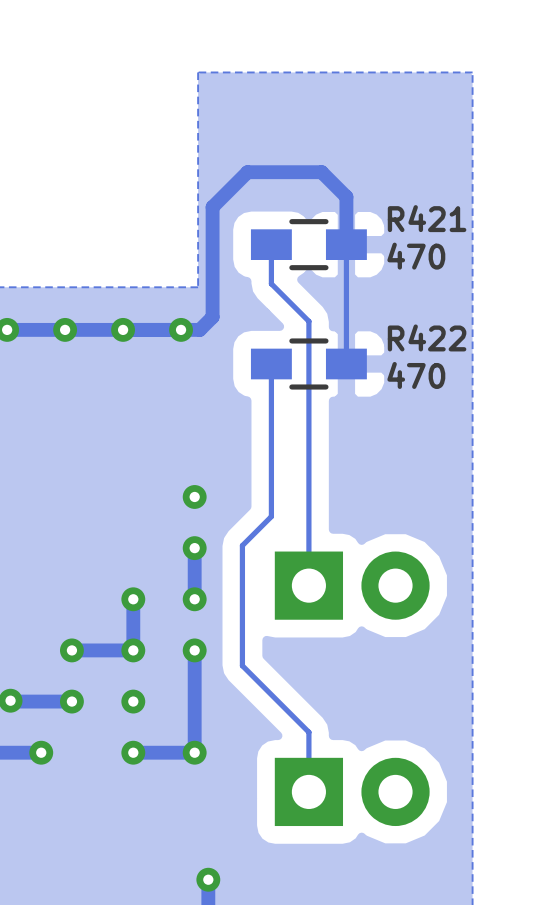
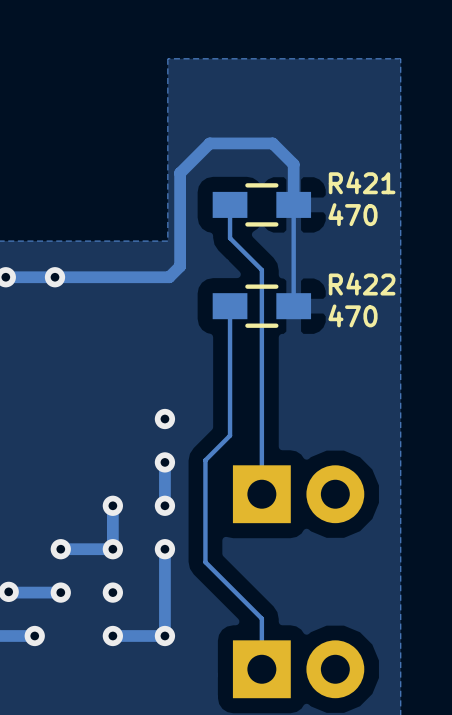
via: (123, 329) -> none
via: (181, 329) -> none

